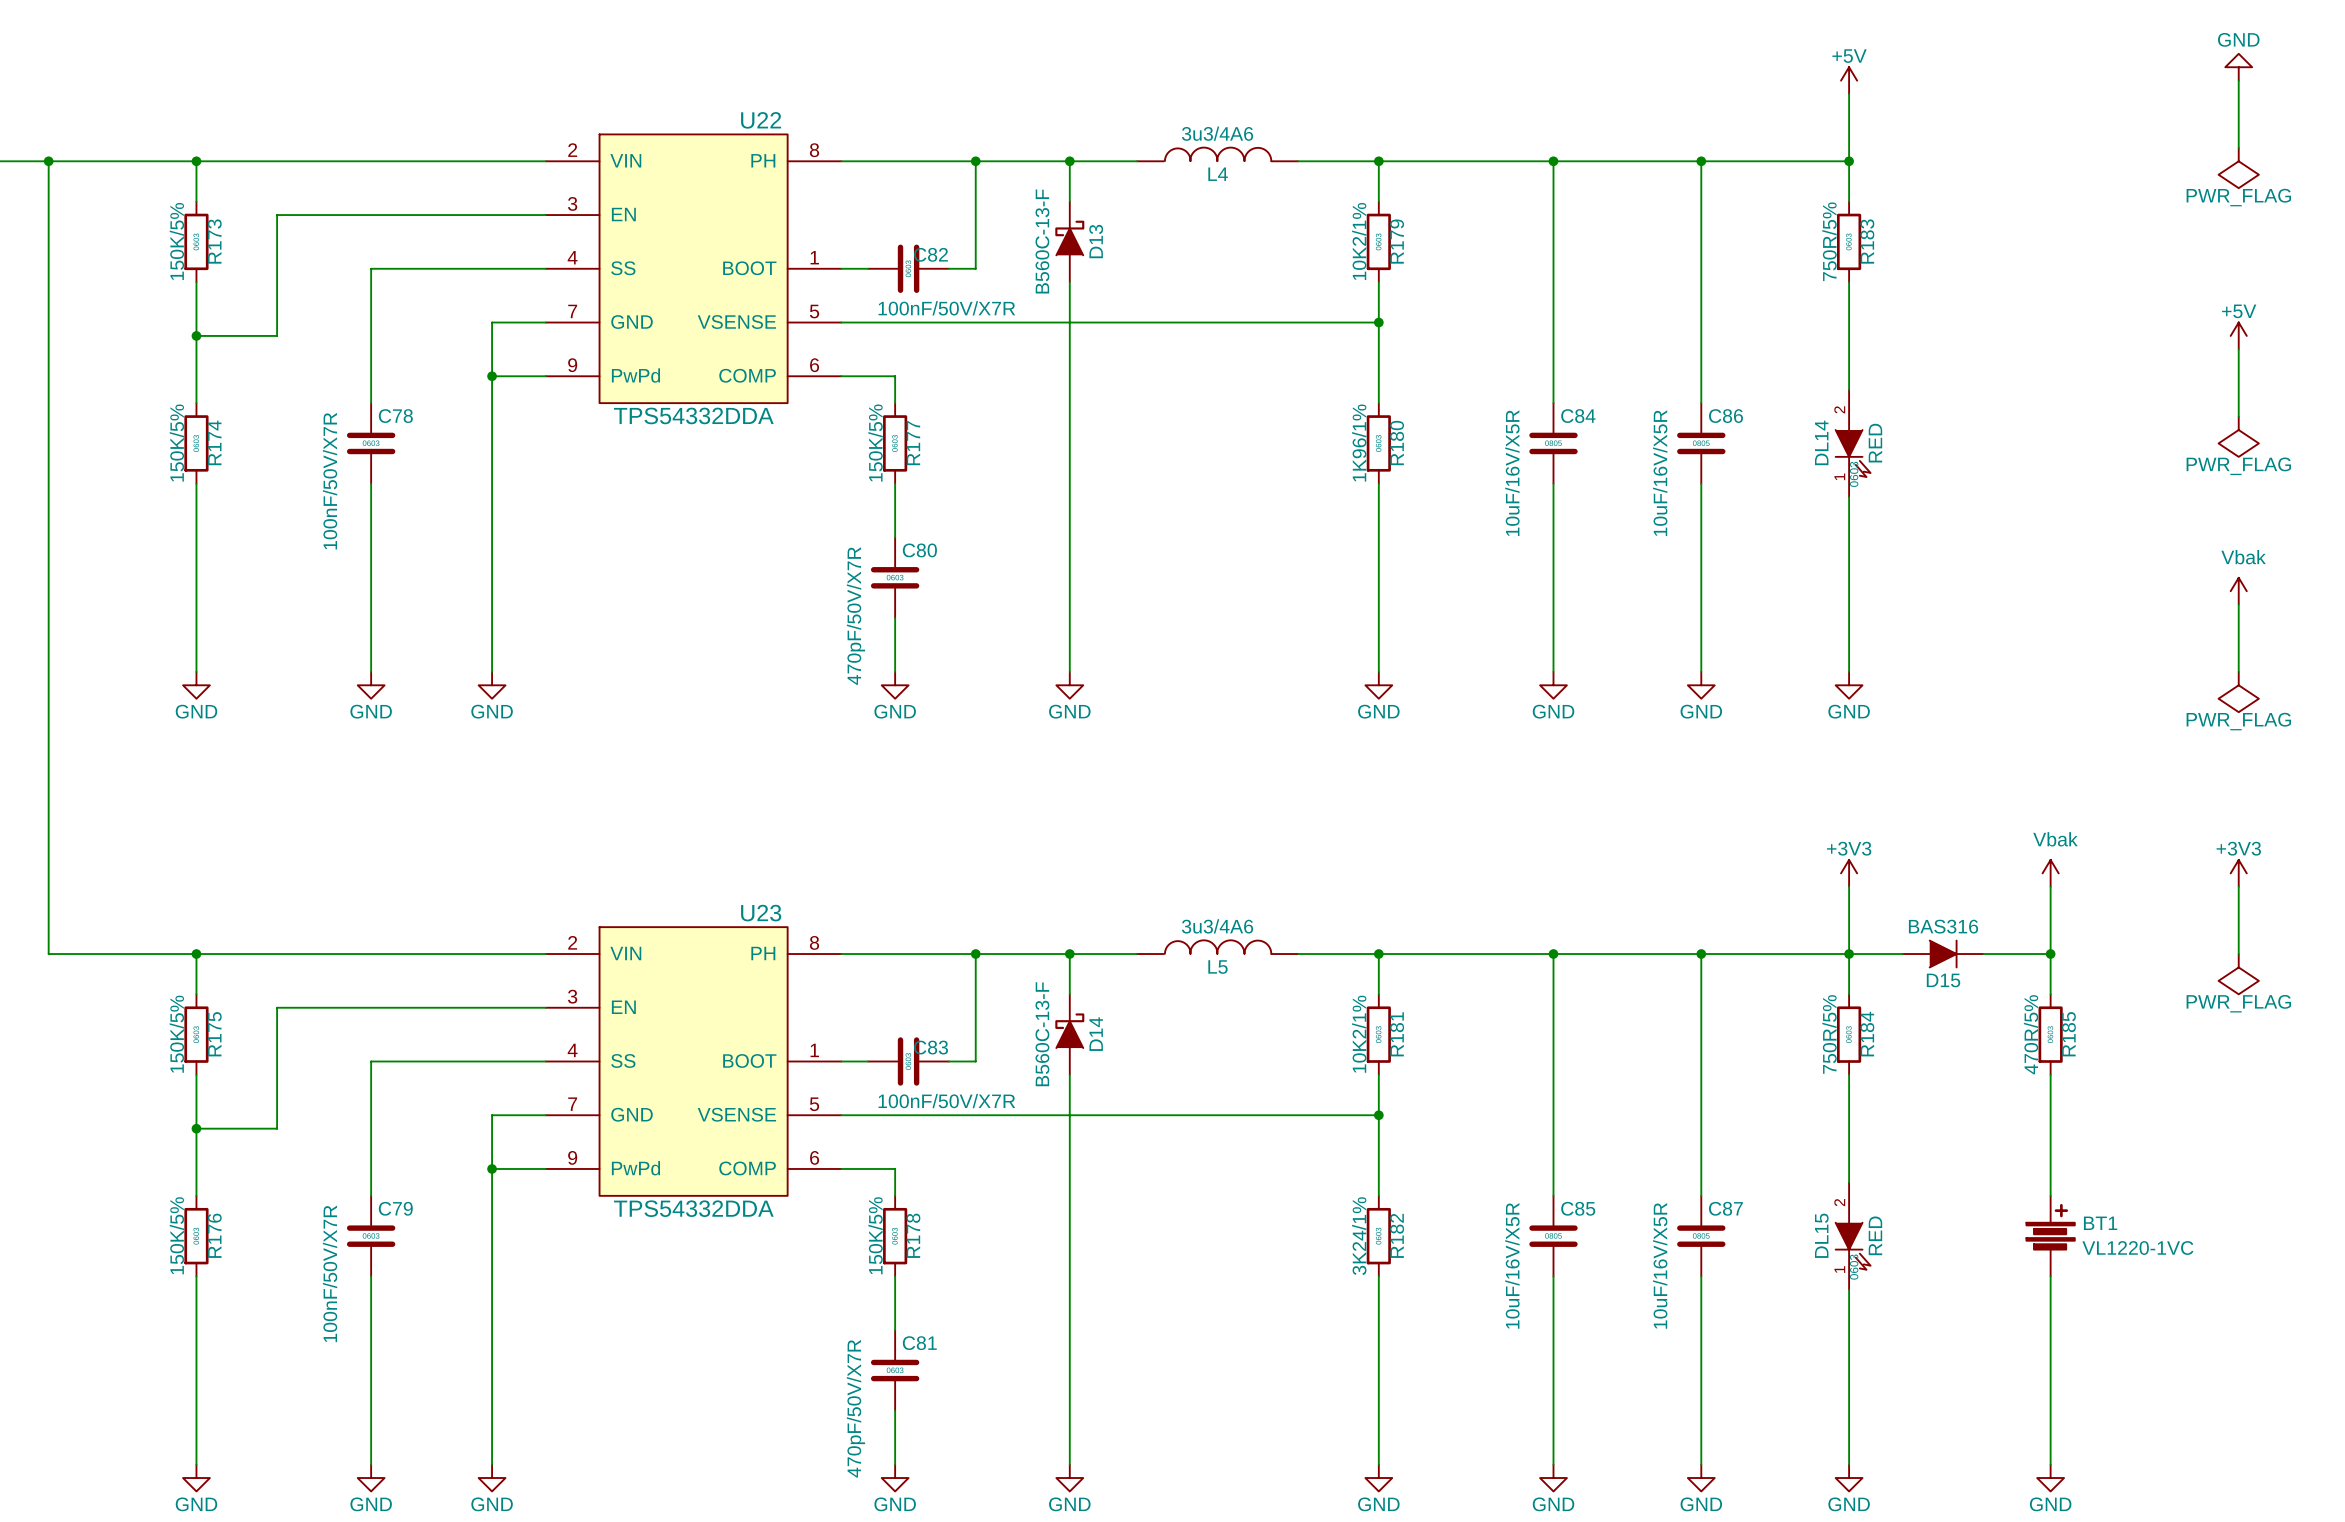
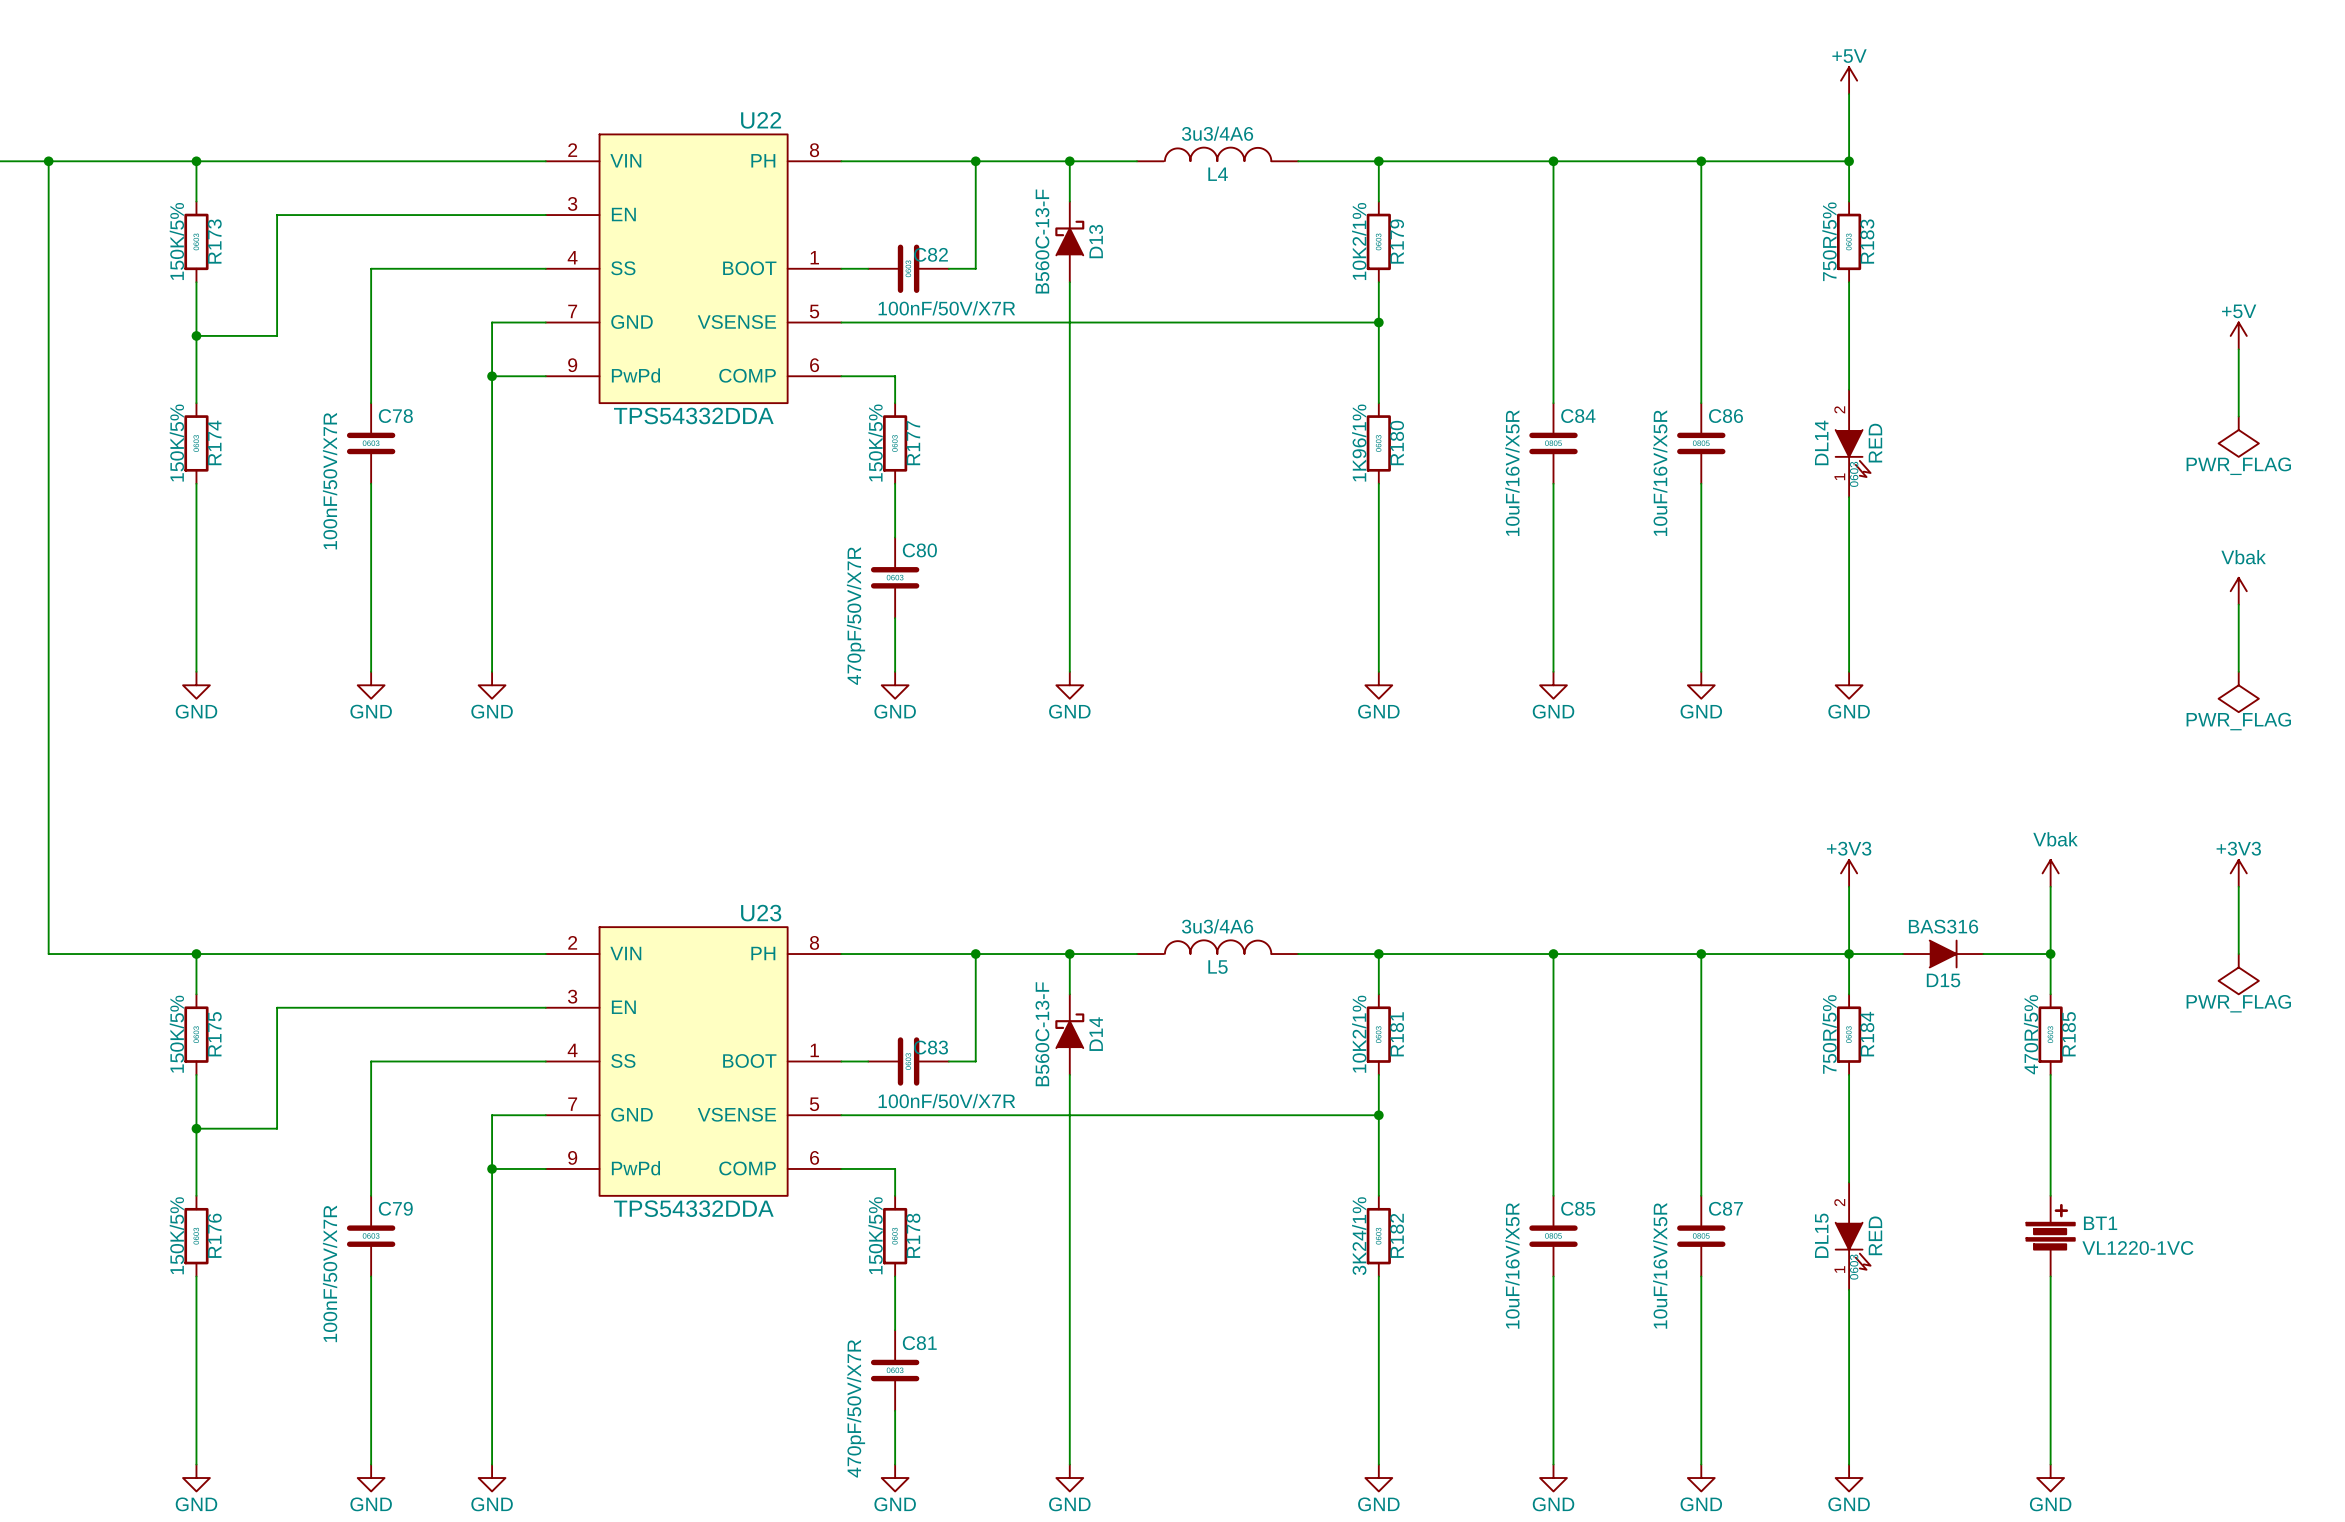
power symbol: GND (2238, 67) -> none
wire: (2238, 80) (2238, 147) -> none
power symbol: PWR_FLAG (2238, 168) -> none

